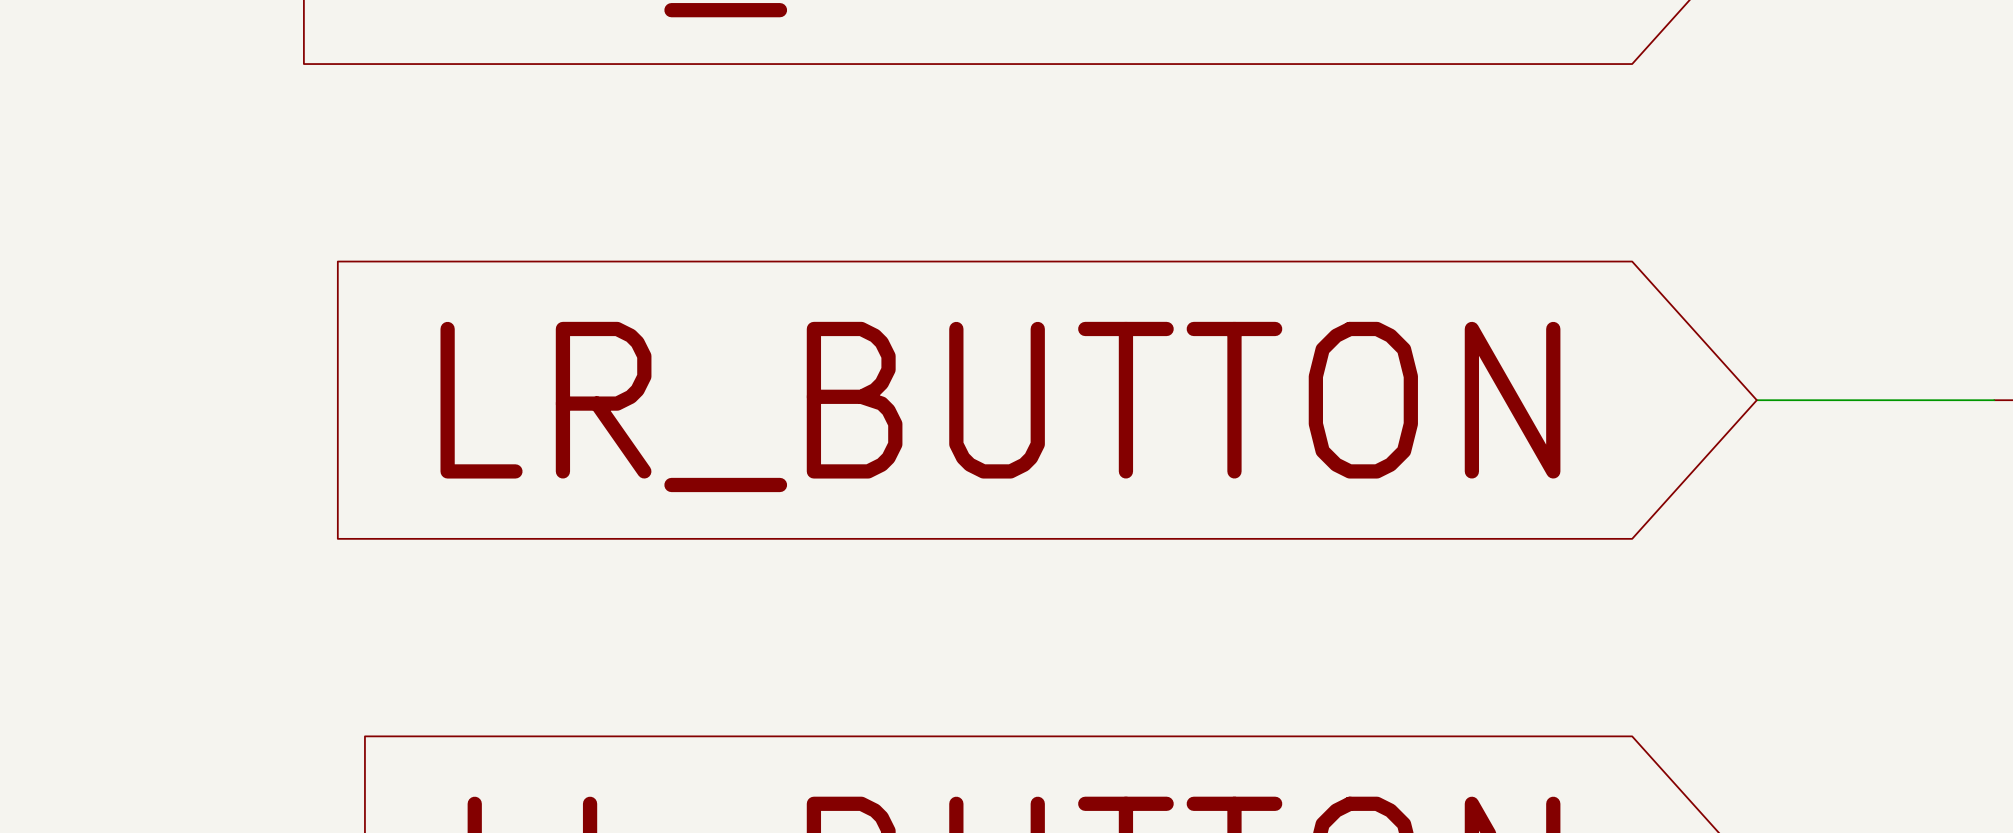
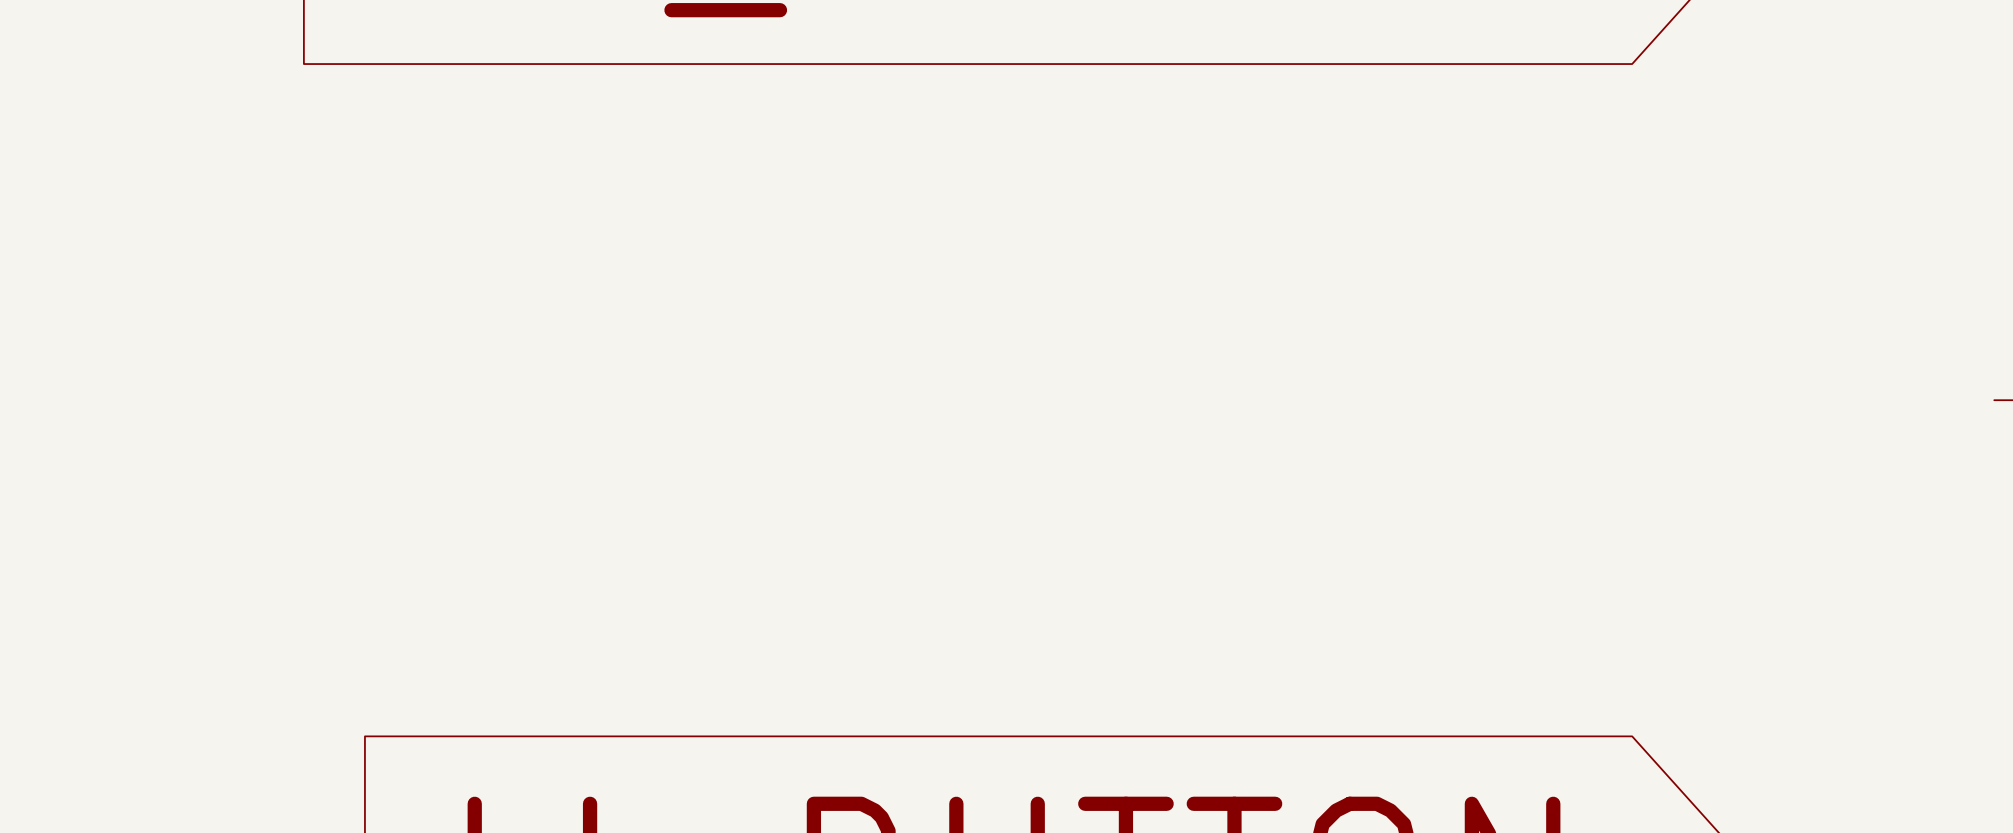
wire: (1756, 400) (1994, 400) -> none
global label: LR_BUTTON (1000, 406) -> none

